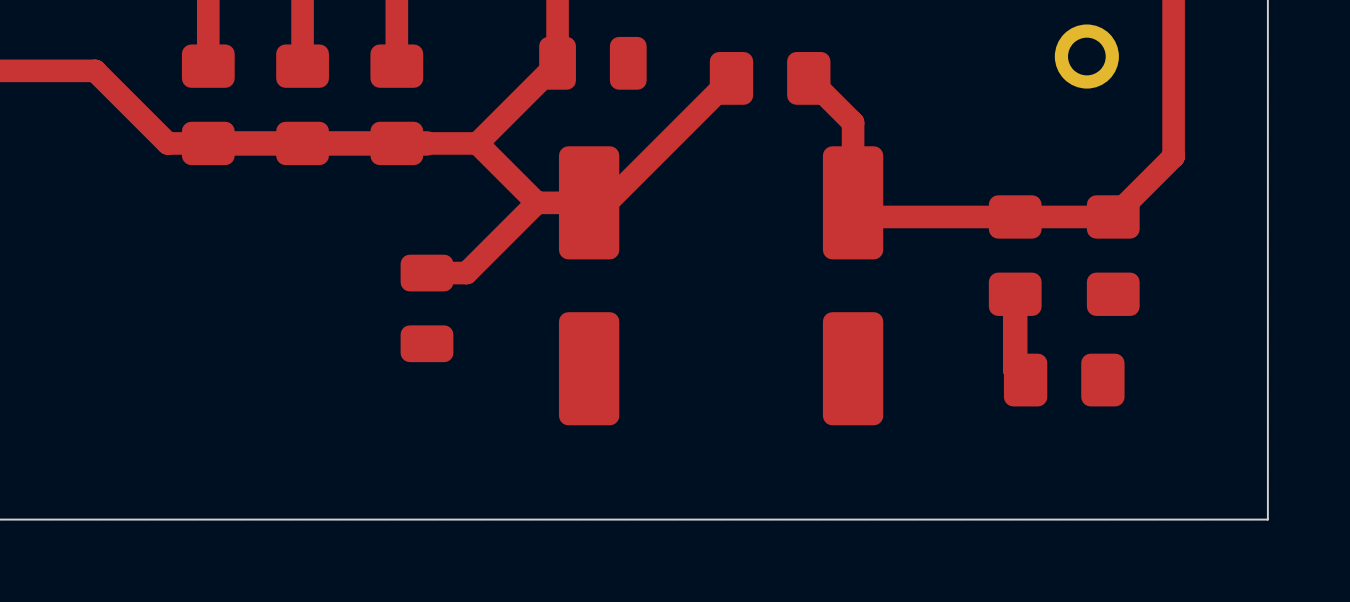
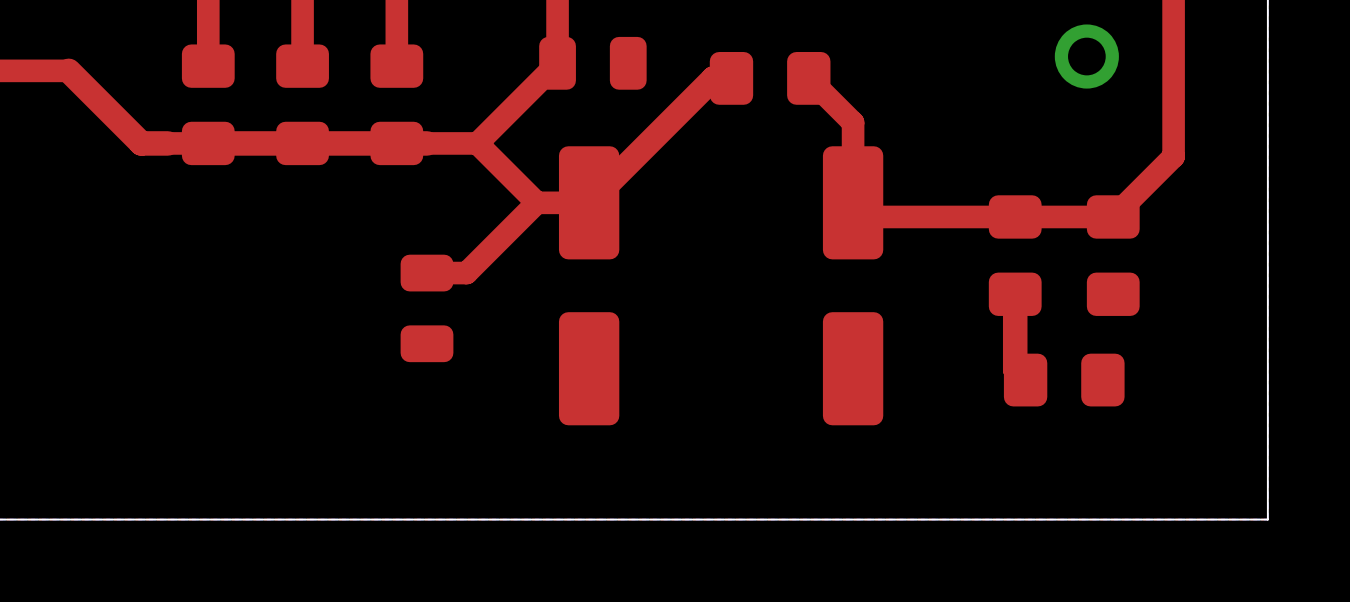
top track: (68, 70) (95, 70) (167, 143) -> (68, 70) (141, 143) (167, 143)
top track: (731, 78) (607, 202) (589, 202) -> (731, 78) (713, 78) (589, 202)

